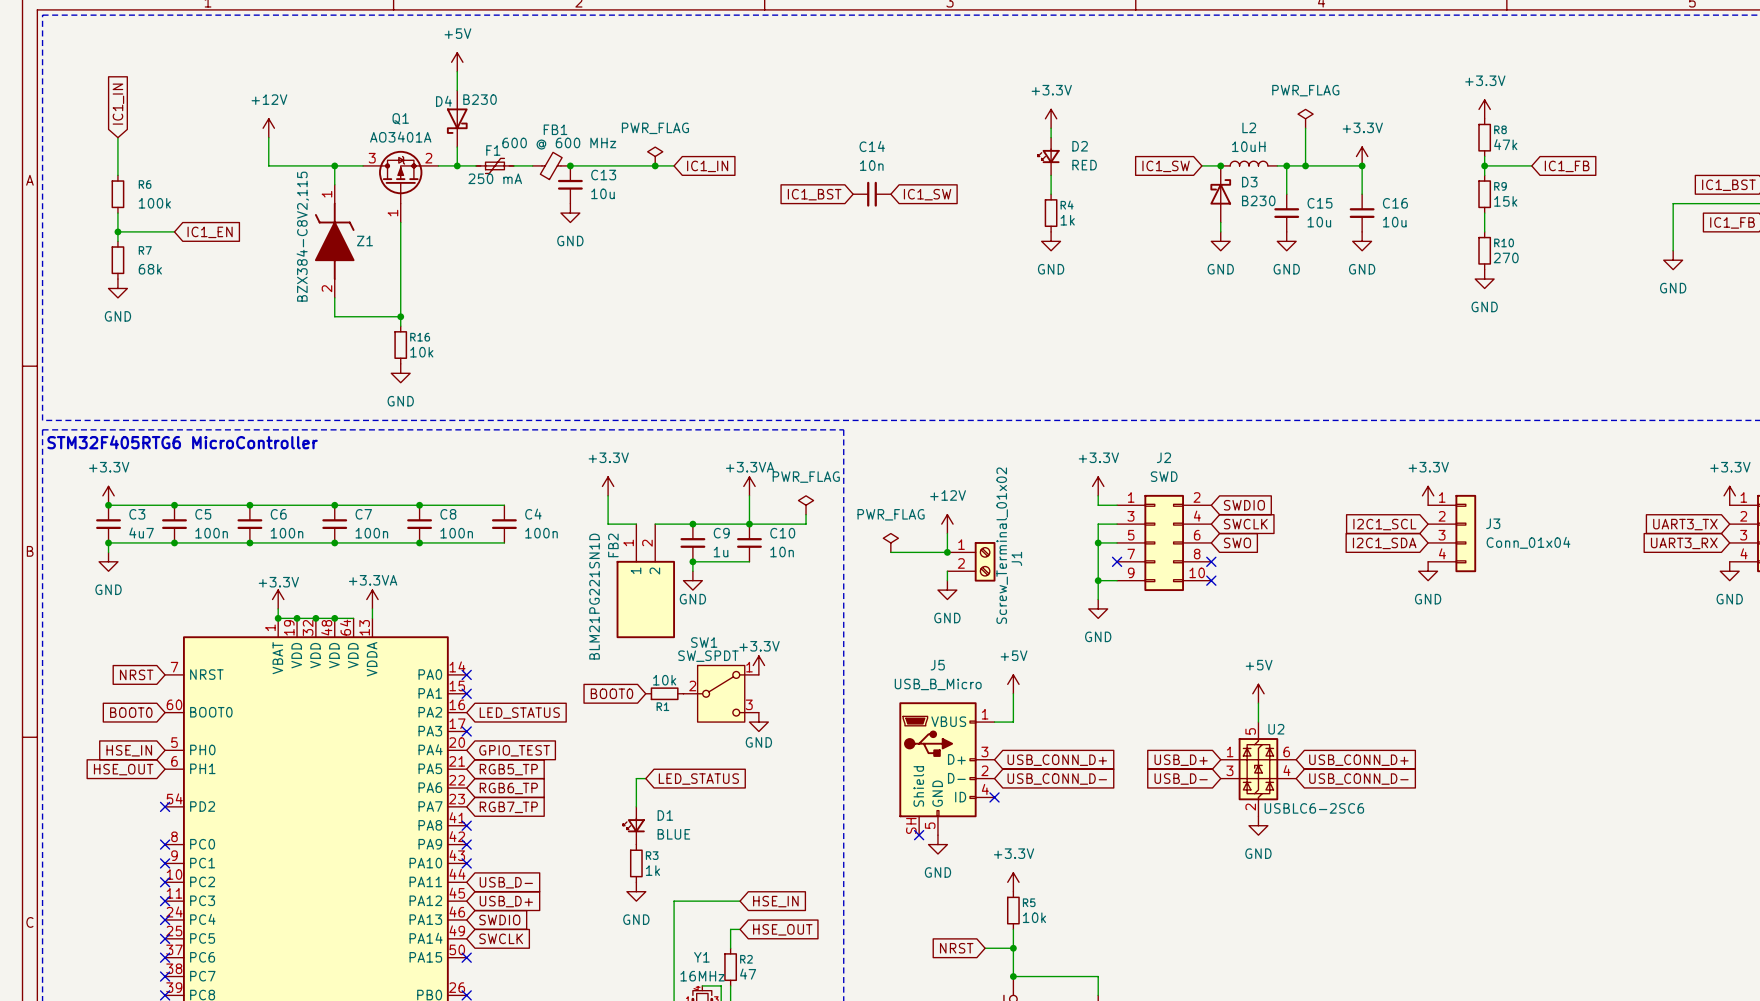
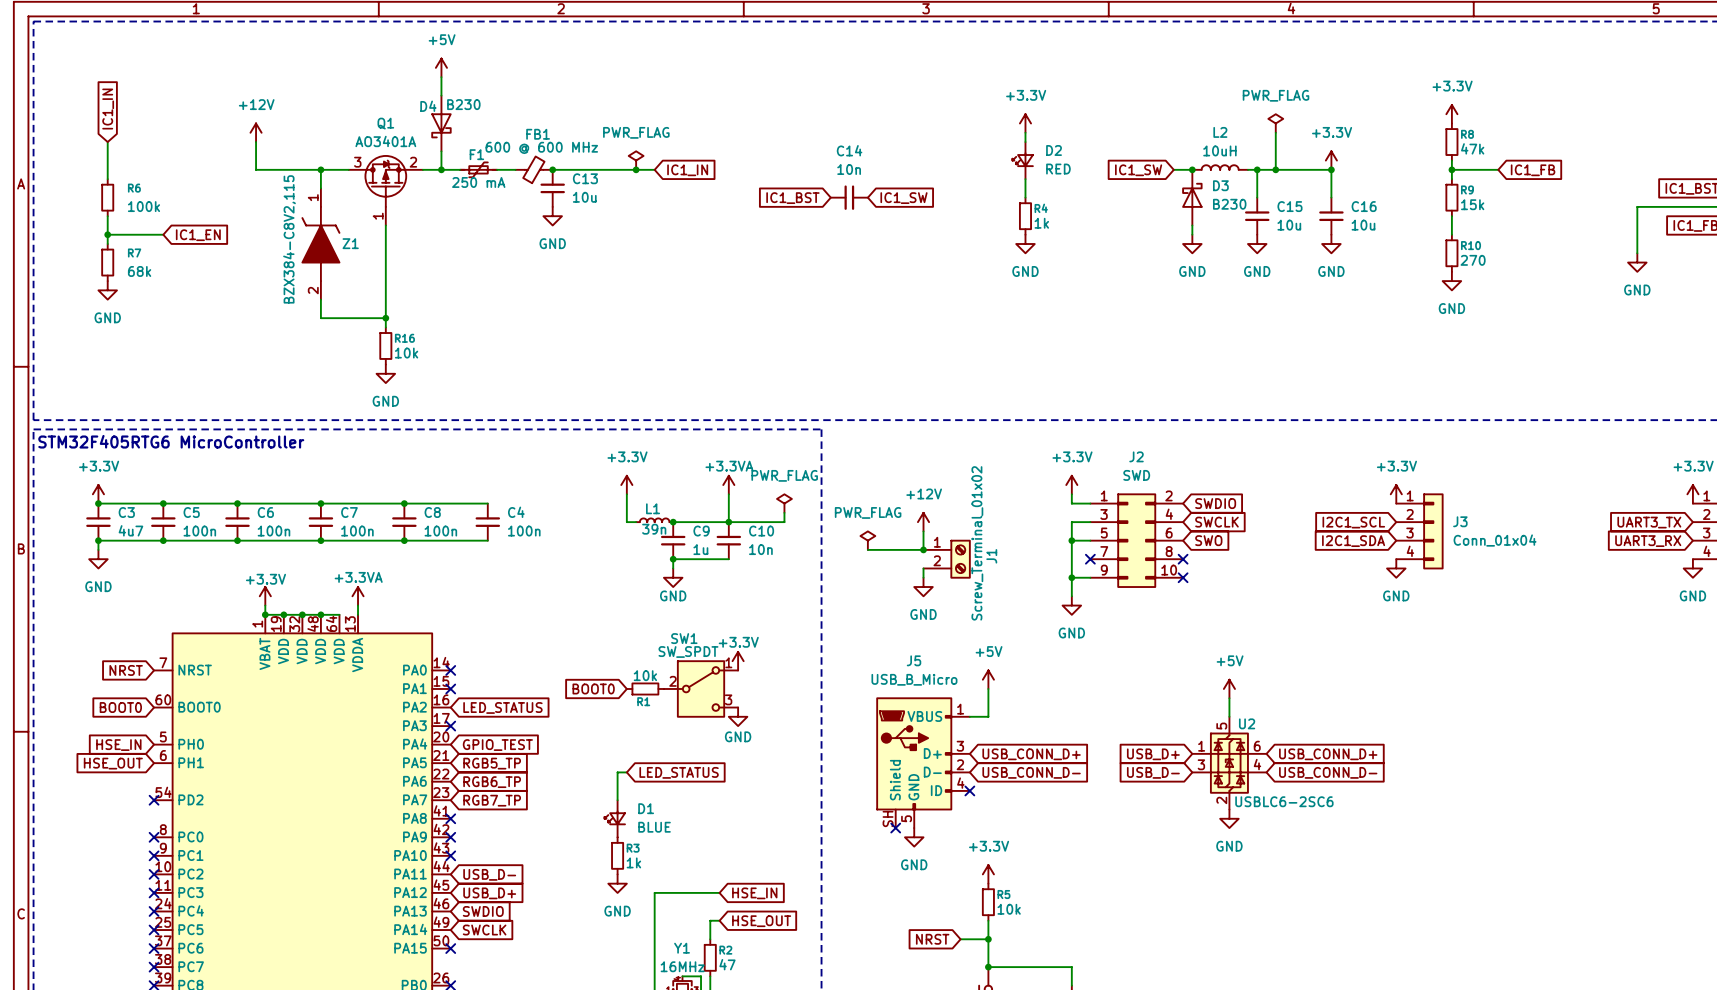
power symbol position: +3.3V (608, 486) -> +3.3V (626, 485)
wire: (608, 495) (608, 524) (636, 524) -> none
L1: none -> 39n (654, 520)
wire: (655, 524) (692, 524) -> (636, 522) (626, 522) (626, 494)
FB2: BLM21PG221SN1D (645, 581) -> none

